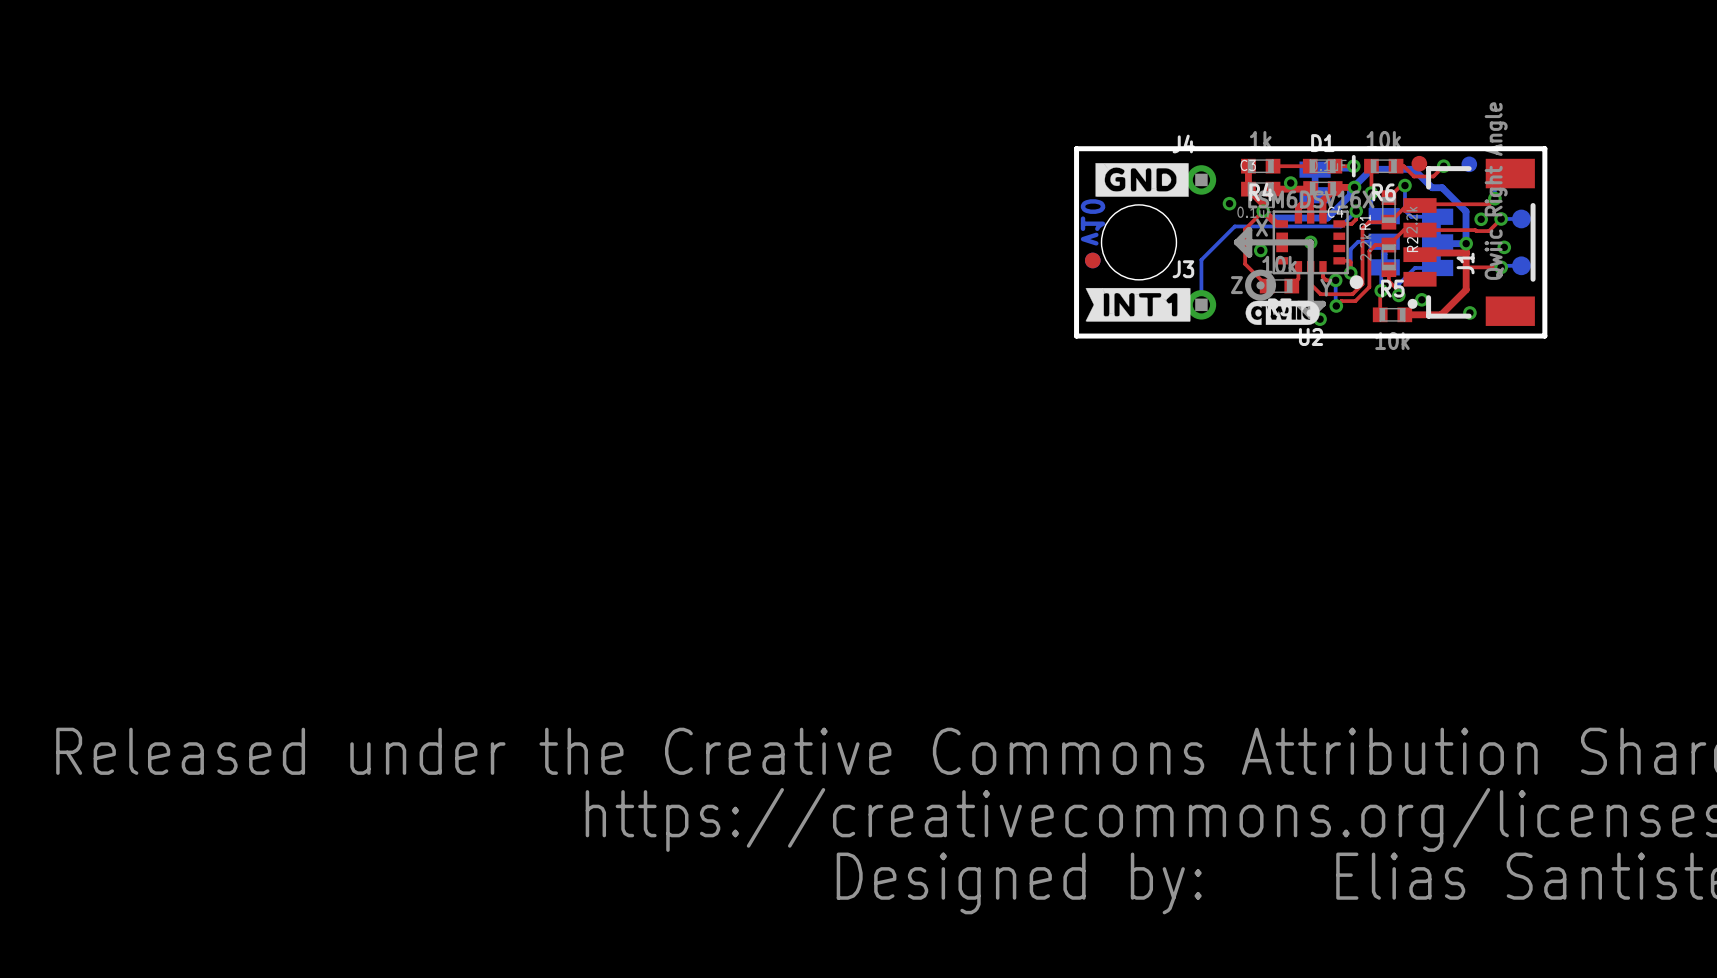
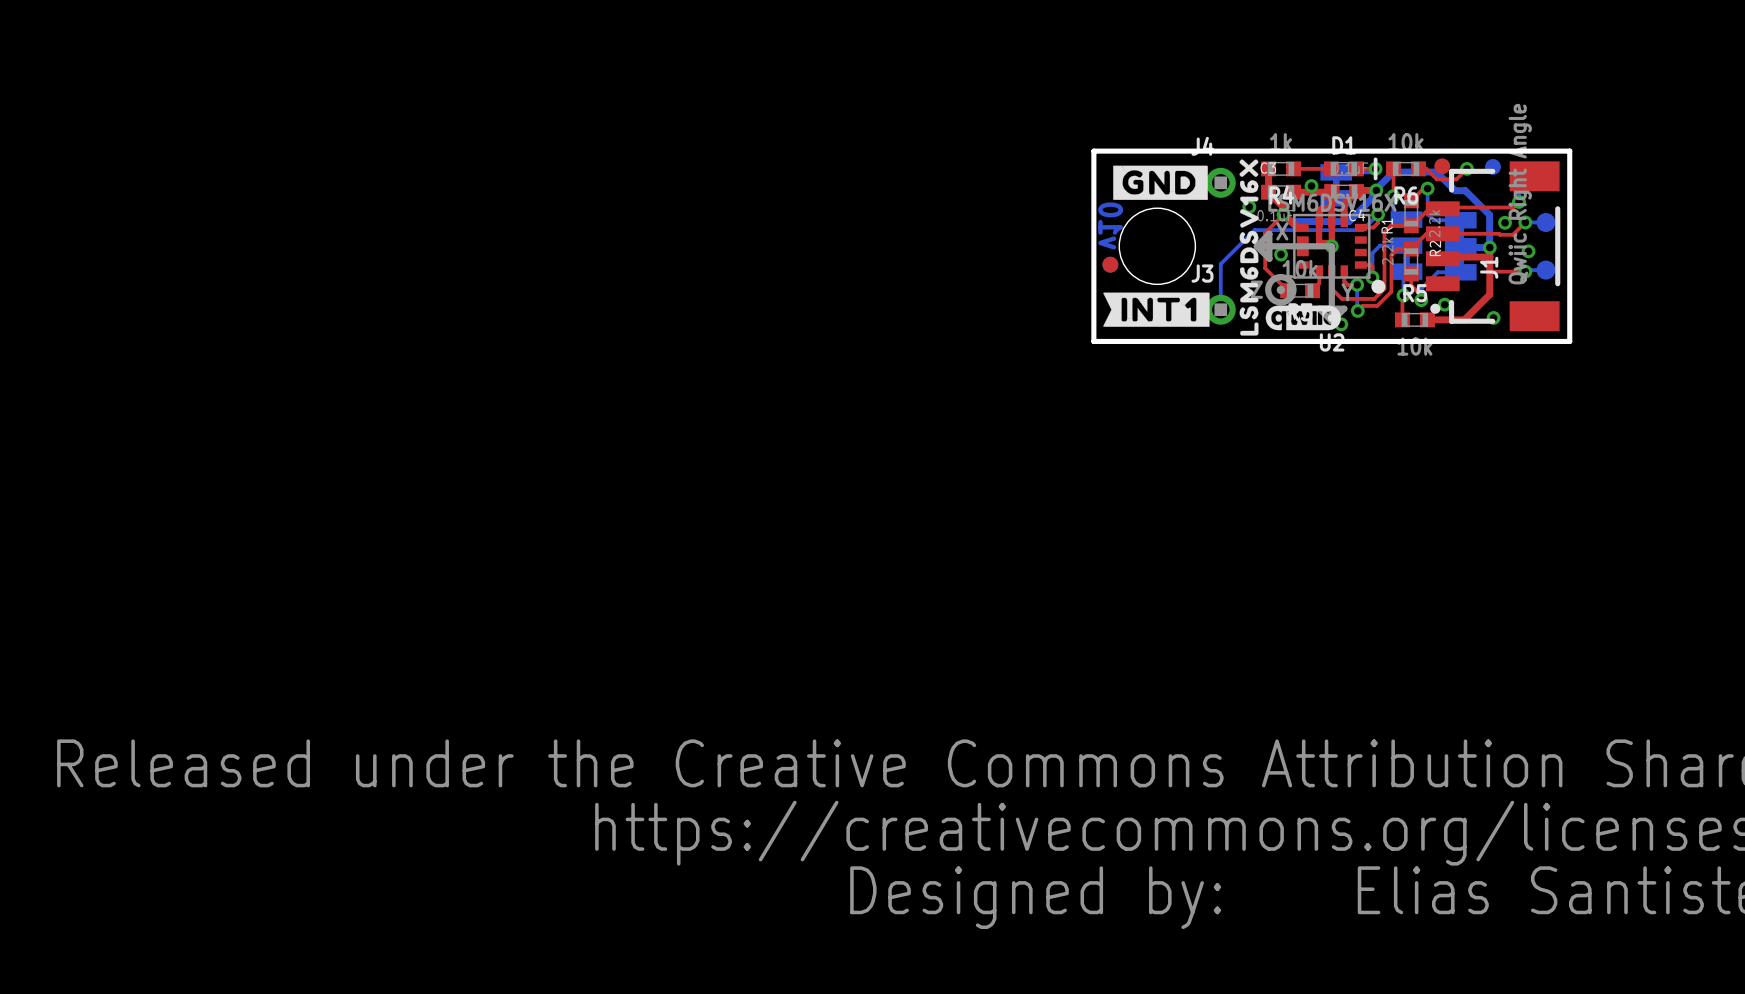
drawing: none -> [1239, 159, 1259, 336]
top track: none -> (1331, 221) (1331, 246) (1328, 243) (1319, 243) (1319, 221)

